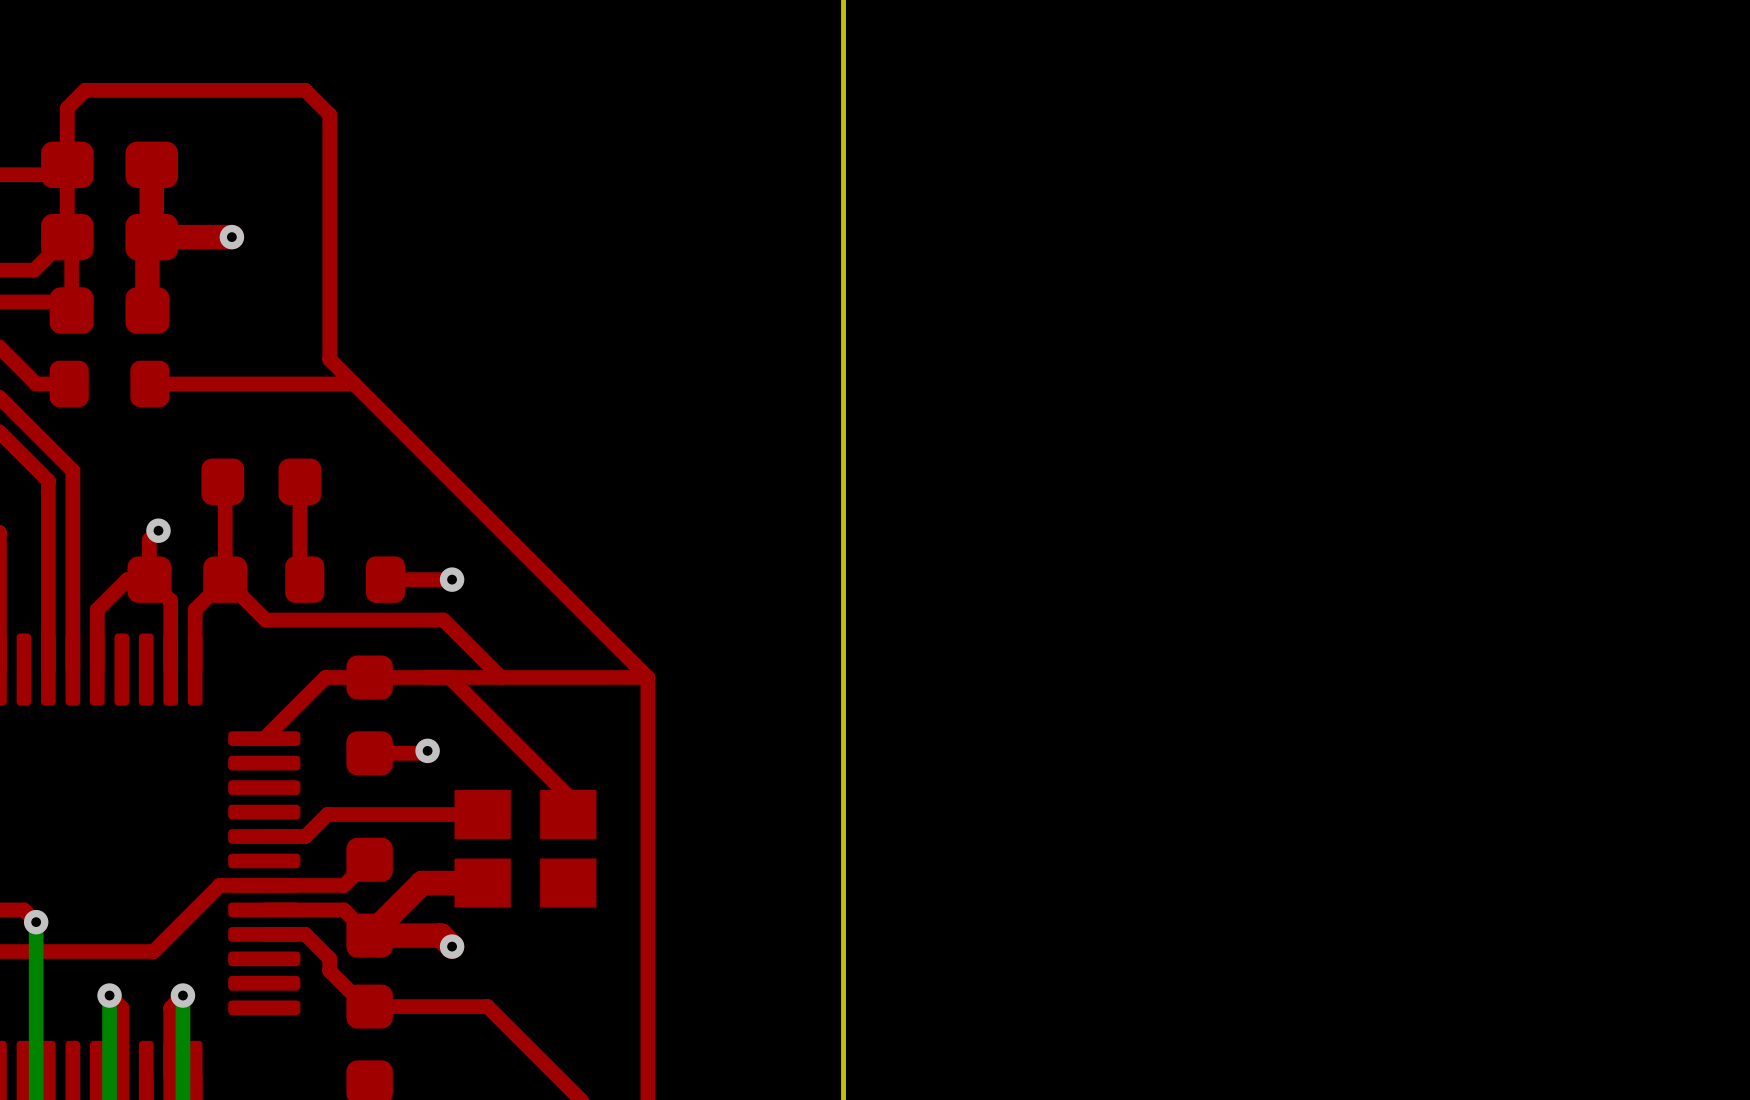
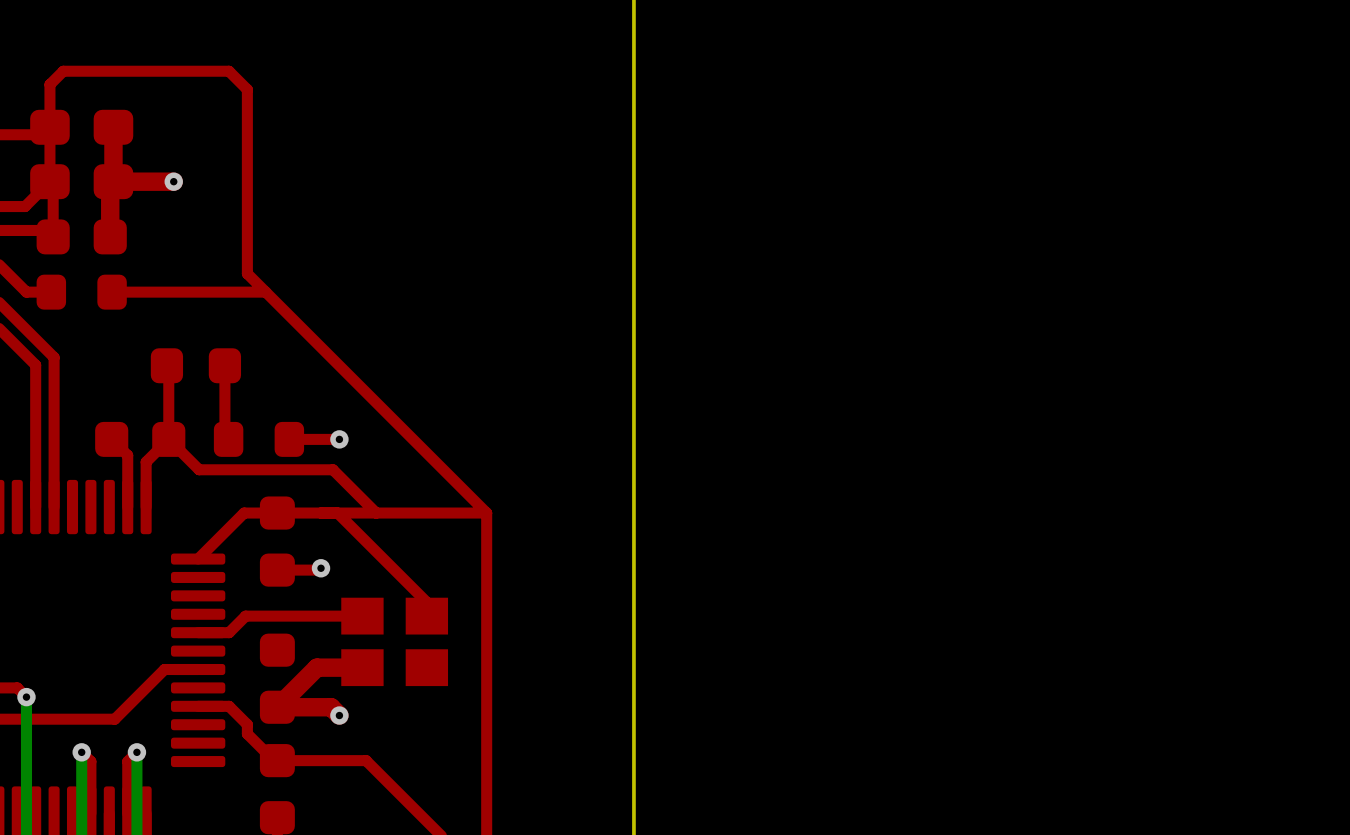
top track: (158, 530) (149, 539) (149, 579) (127, 579) (97, 609) (97, 669) -> none
via: (158, 530) -> none
top track: (369, 859) (343, 885) (264, 885) -> none
top track: (264, 909) (343, 909) (369, 935) -> none

